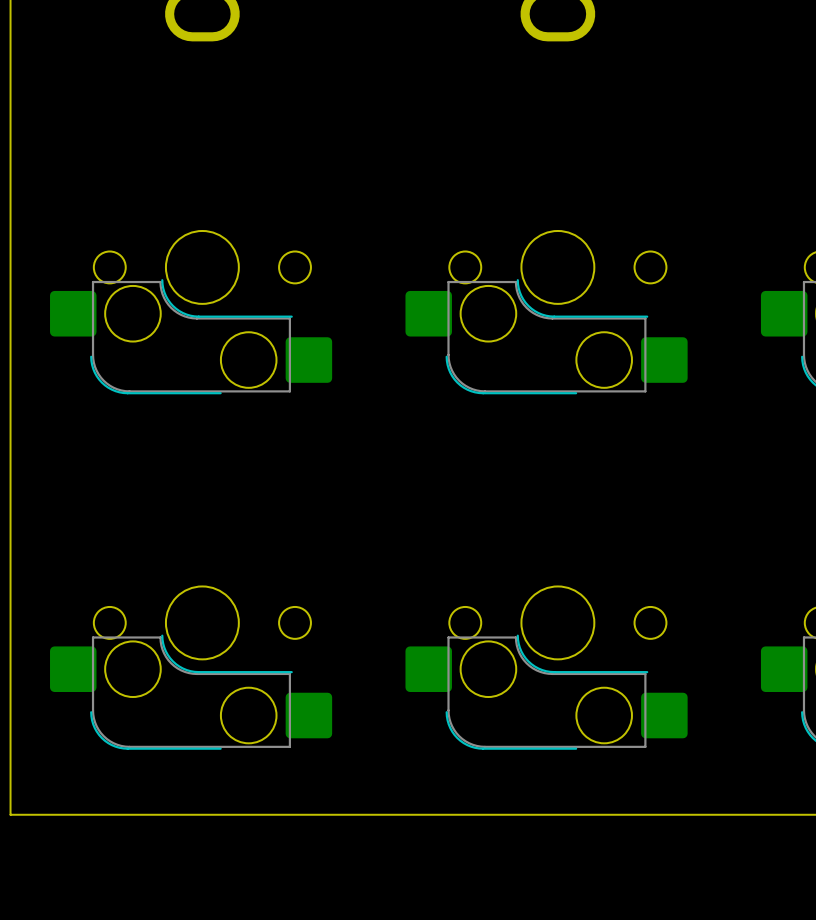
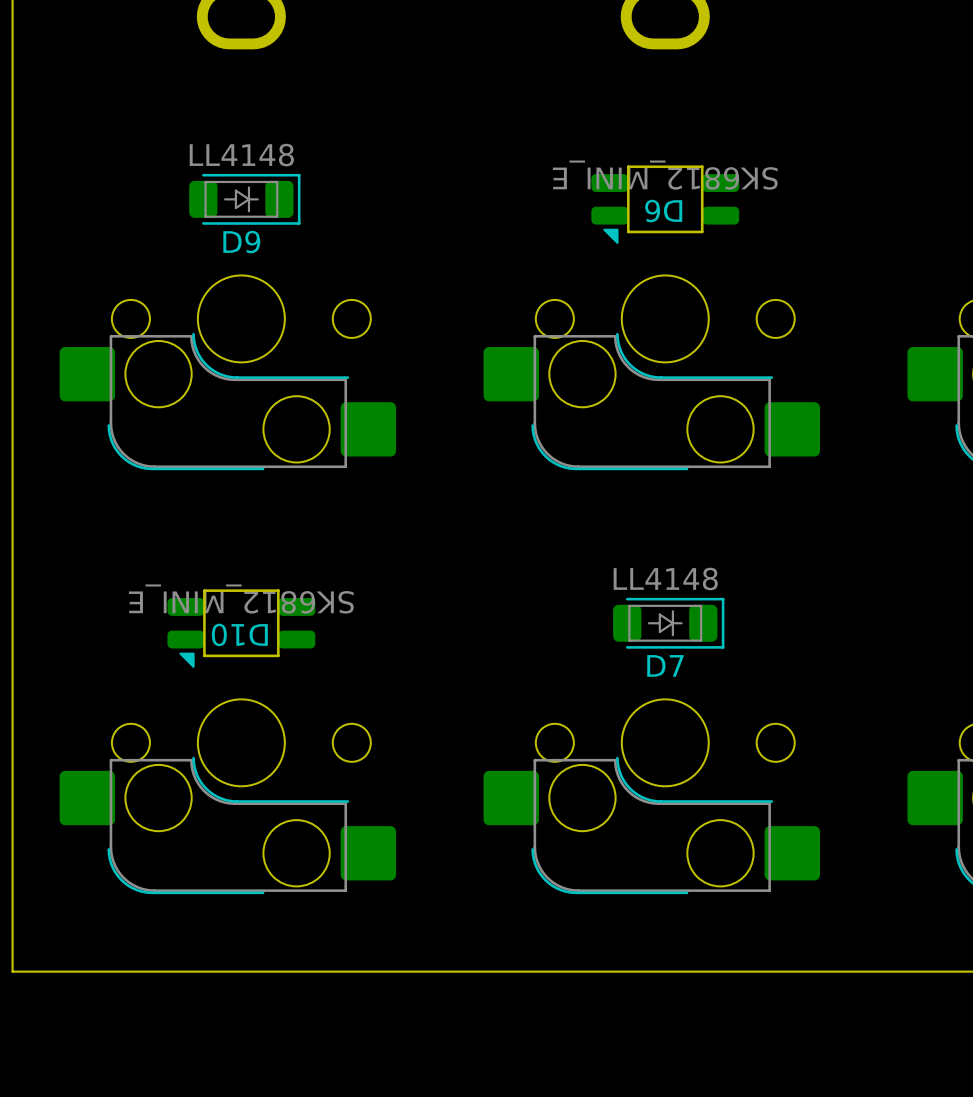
D9: none -> LL4148 (244, 199)
D6: none -> SK6812_MINI_E (665, 204)
D7: none -> LL4148 (668, 623)
D10: none -> SK6812_MINI_E (241, 628)

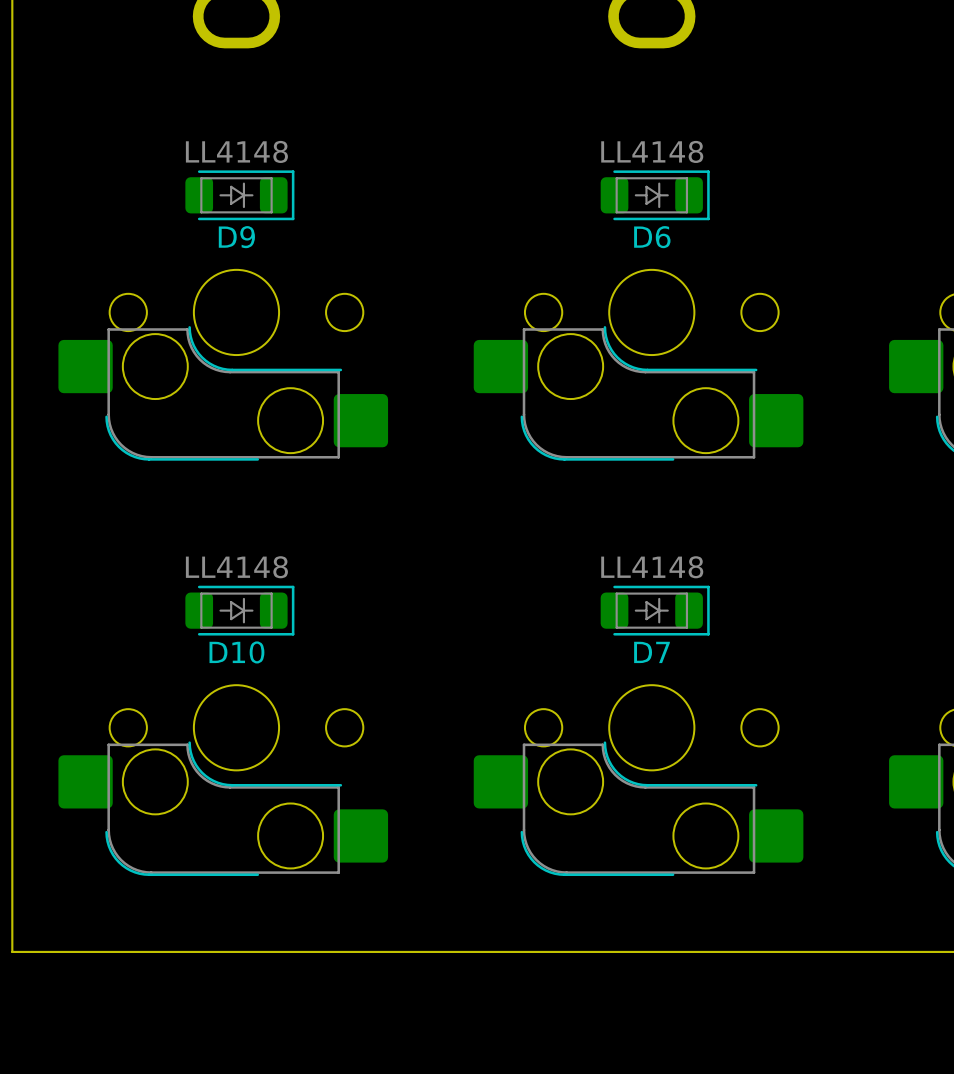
D6 footprint: [591, 165, 740, 244] -> [600, 170, 710, 221]
D6 value: SK6812_MINI_E (665, 175) -> LL4148 (652, 151)
D10 footprint: [167, 589, 316, 668] -> [185, 585, 295, 636]
D10 value: SK6812_MINI_E (241, 599) -> LL4148 (236, 567)

